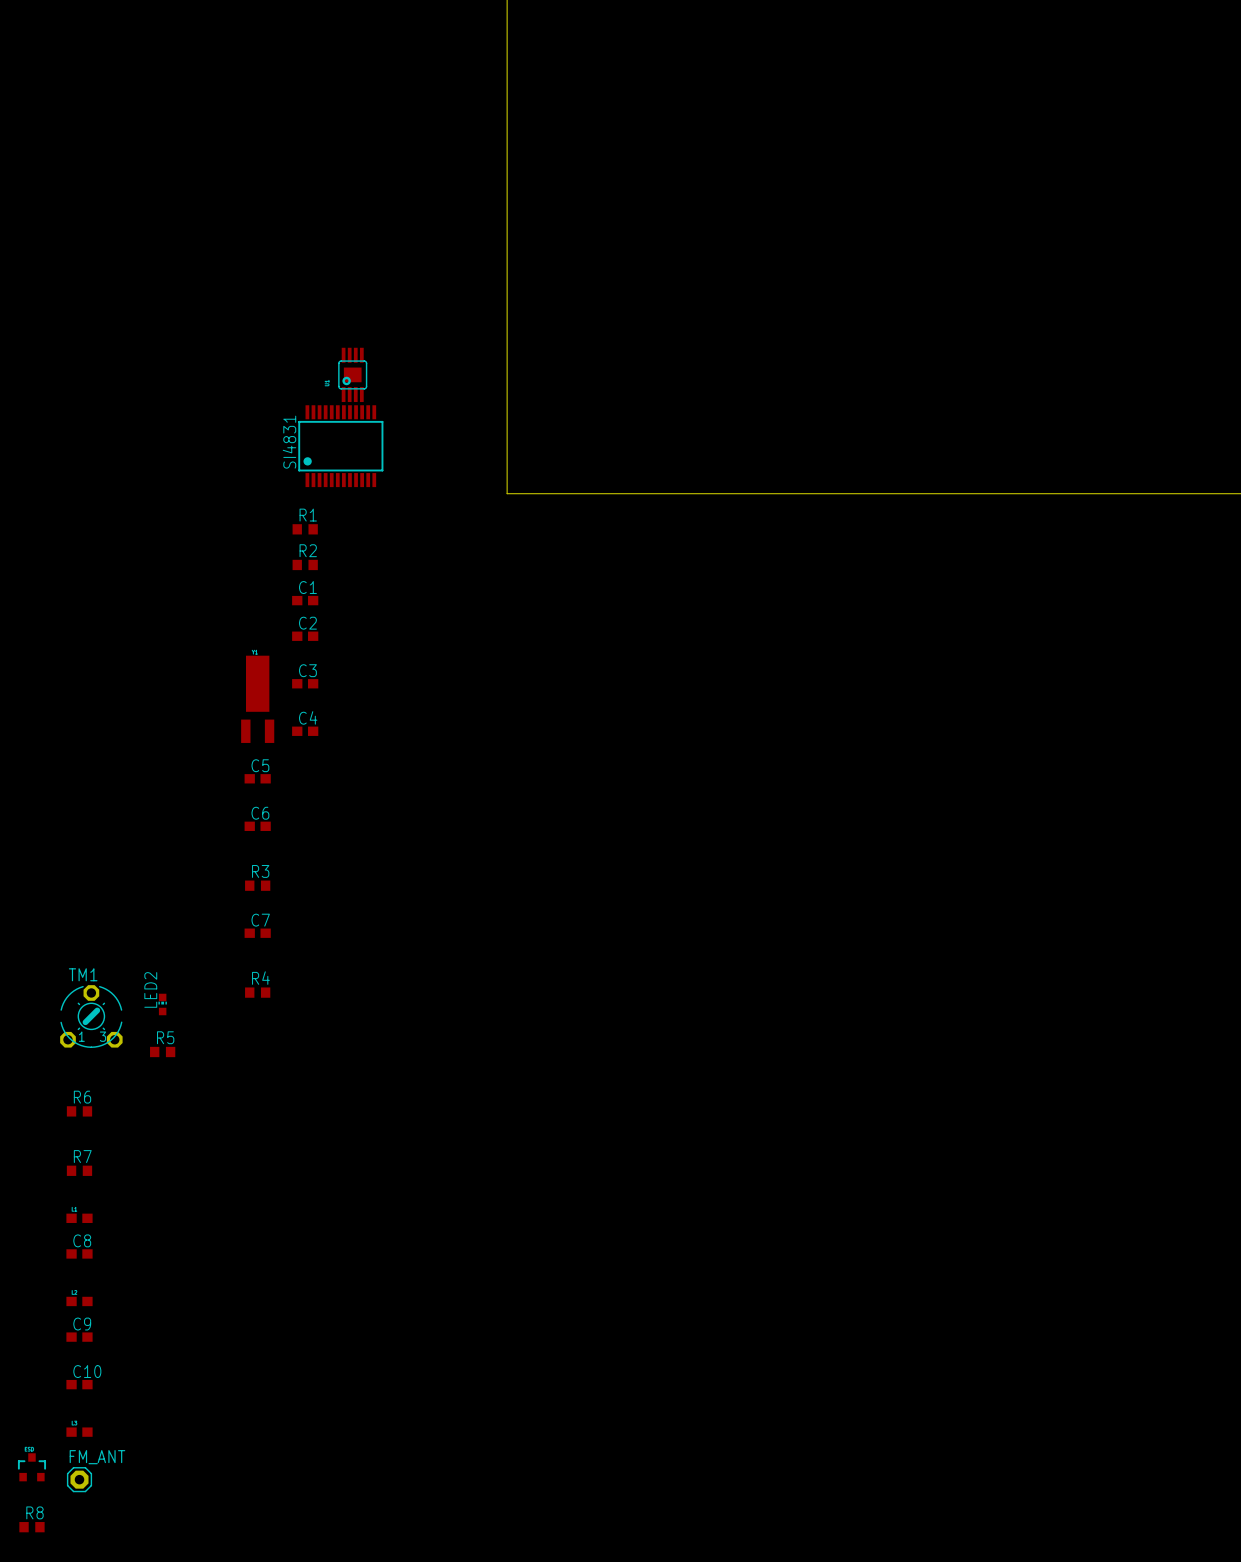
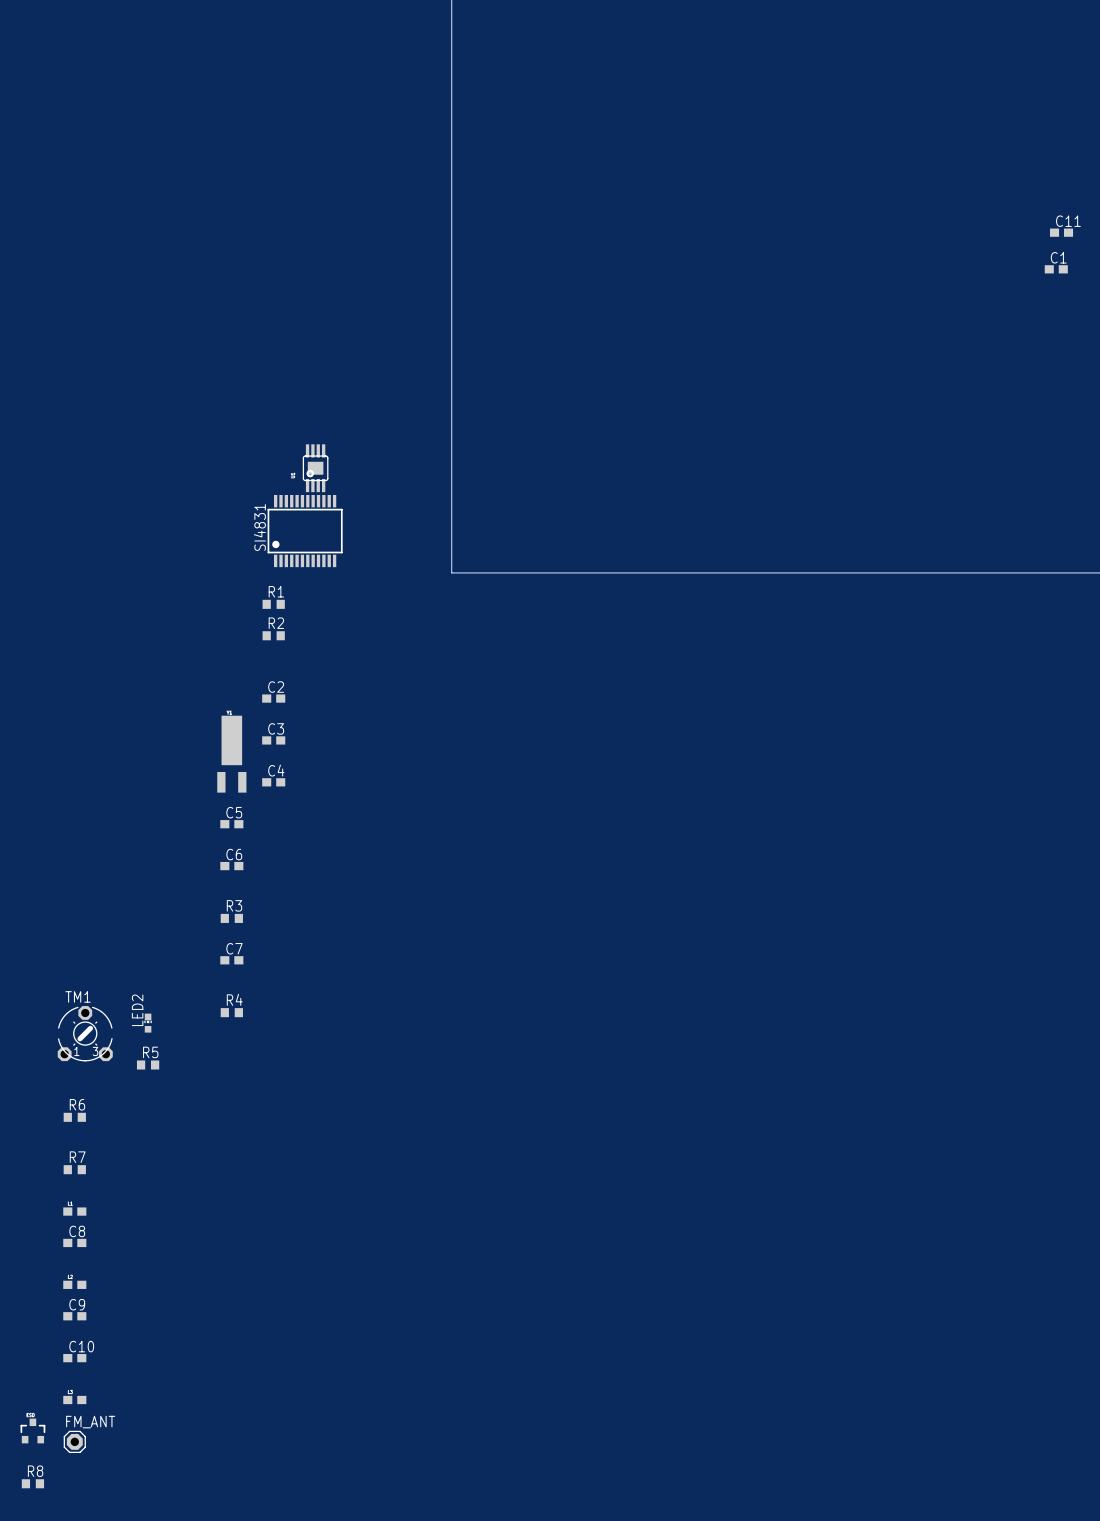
C11: none -> (1061, 232)
C1 position: (305, 600) -> (1056, 269)

